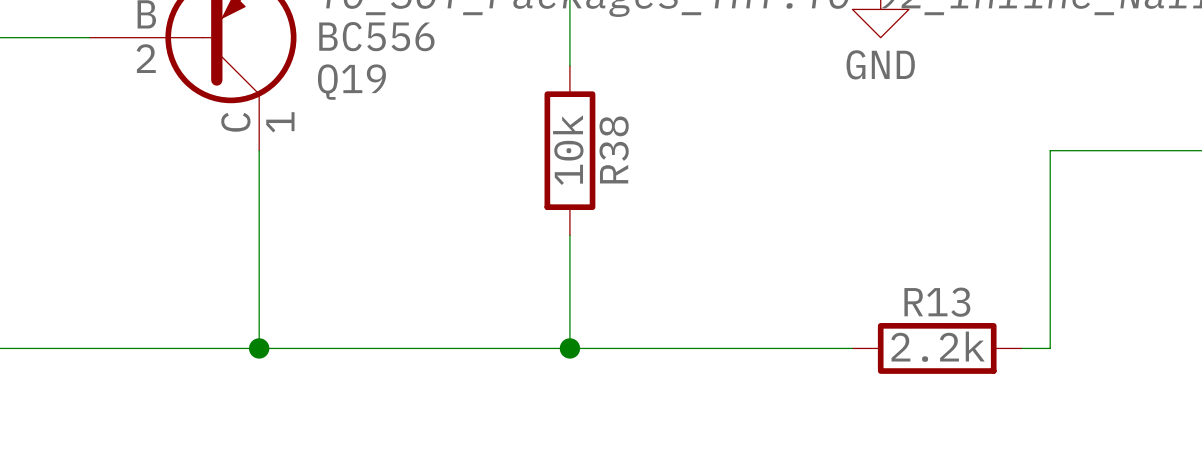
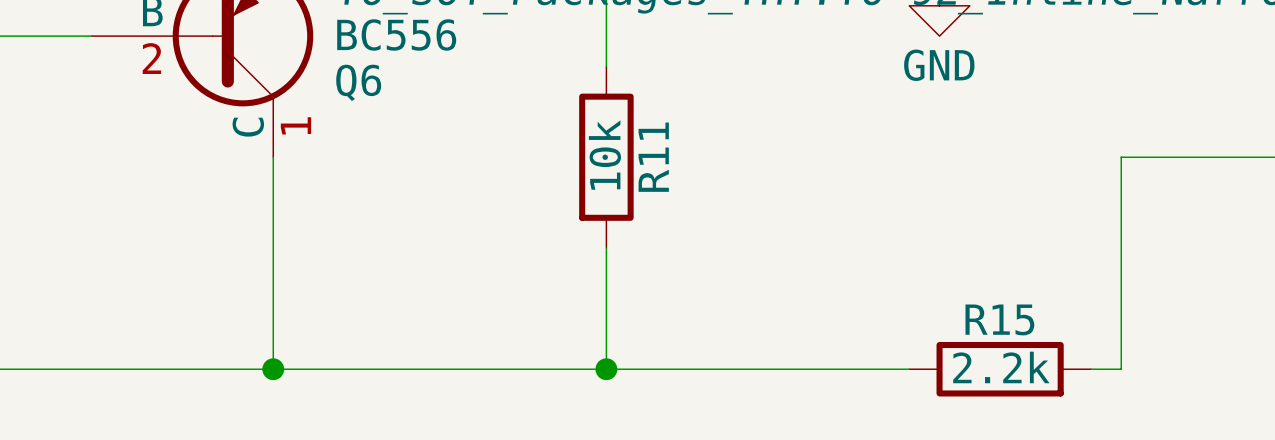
Q19 name: Q19 (351, 82) -> Q6 (358, 82)
R38 name: R38 (614, 149) -> R11 (653, 157)
R13 name: R13 (937, 302) -> R15 (999, 319)

